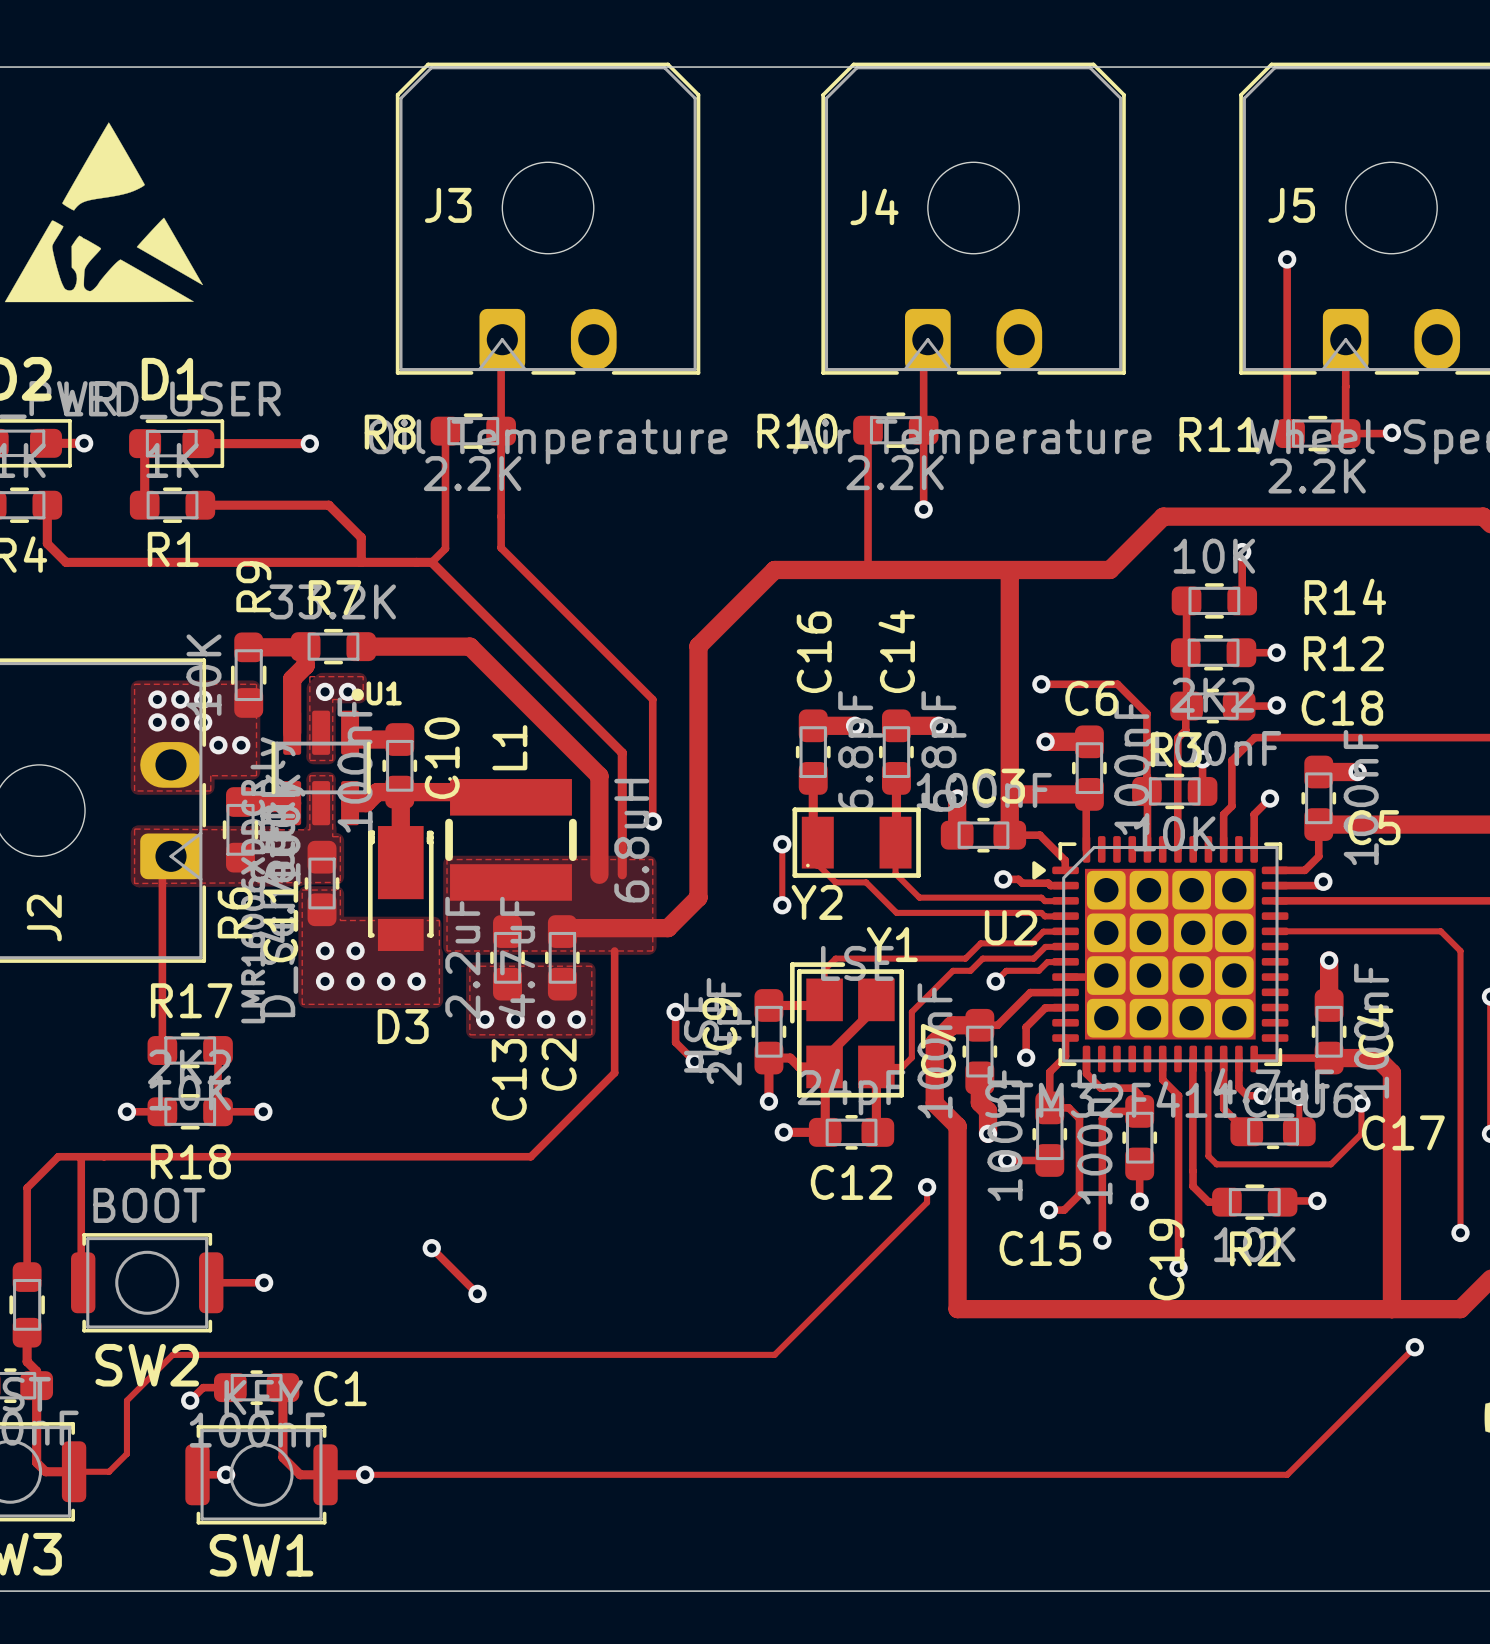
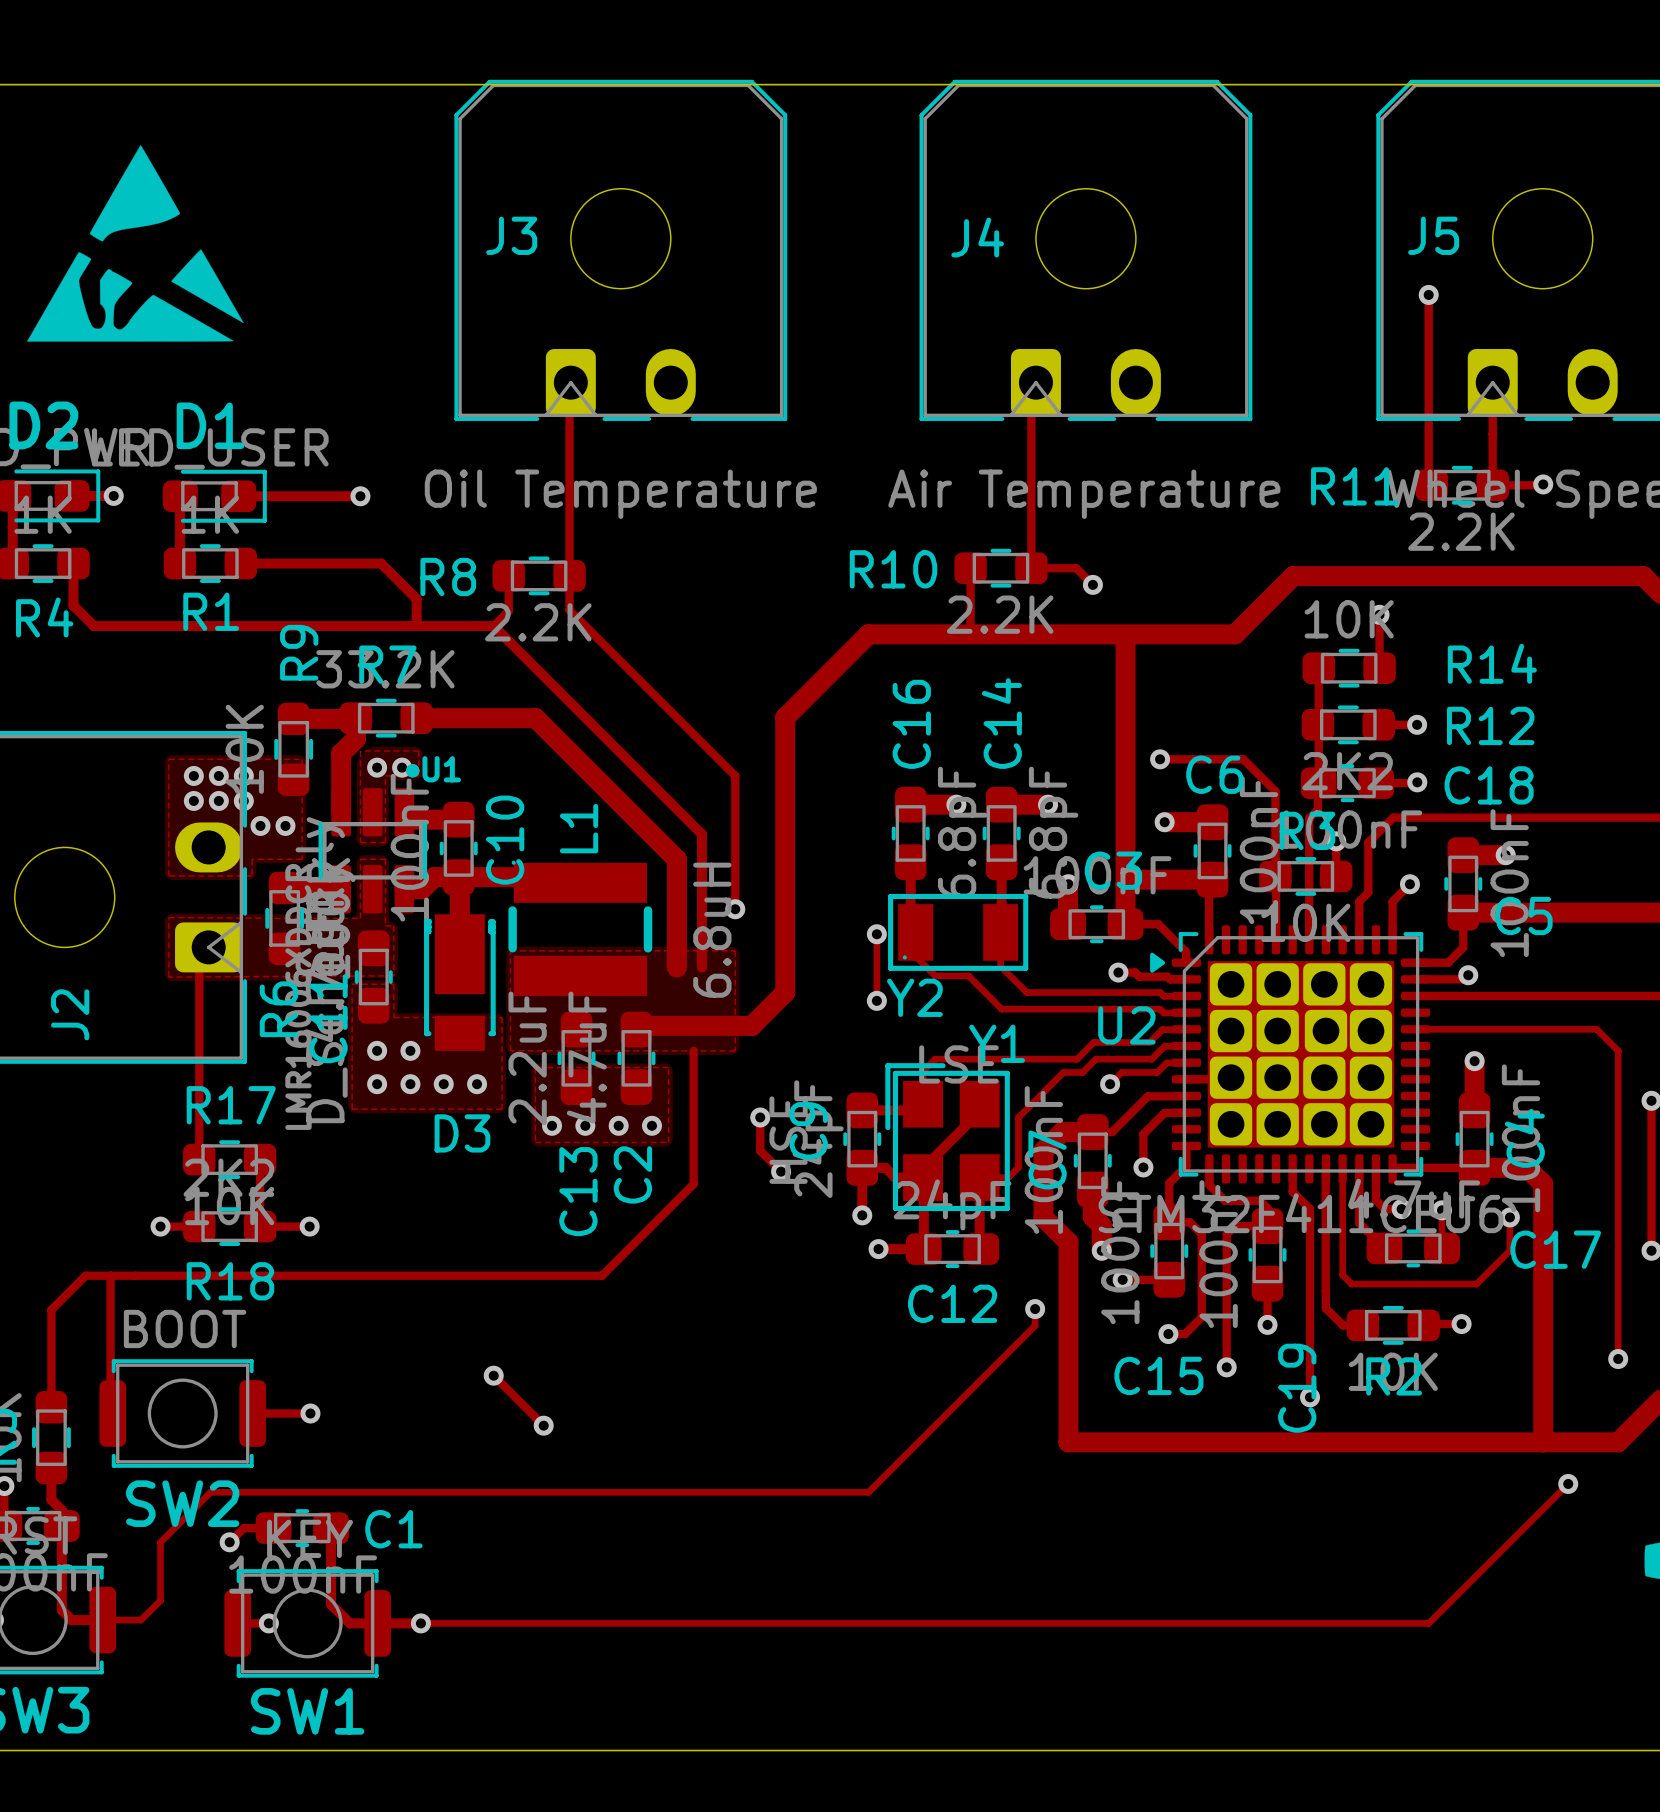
track: (868, 430) (868, 509) -> none
R10 position: (895, 430) -> (1000, 568)
track: (445, 431) (445, 516) -> none
R8 position: (473, 431) -> (539, 575)
track: none -> (1031, 568) (1076, 568) (1092, 584)
via position: (923, 509) -> (1092, 584)

